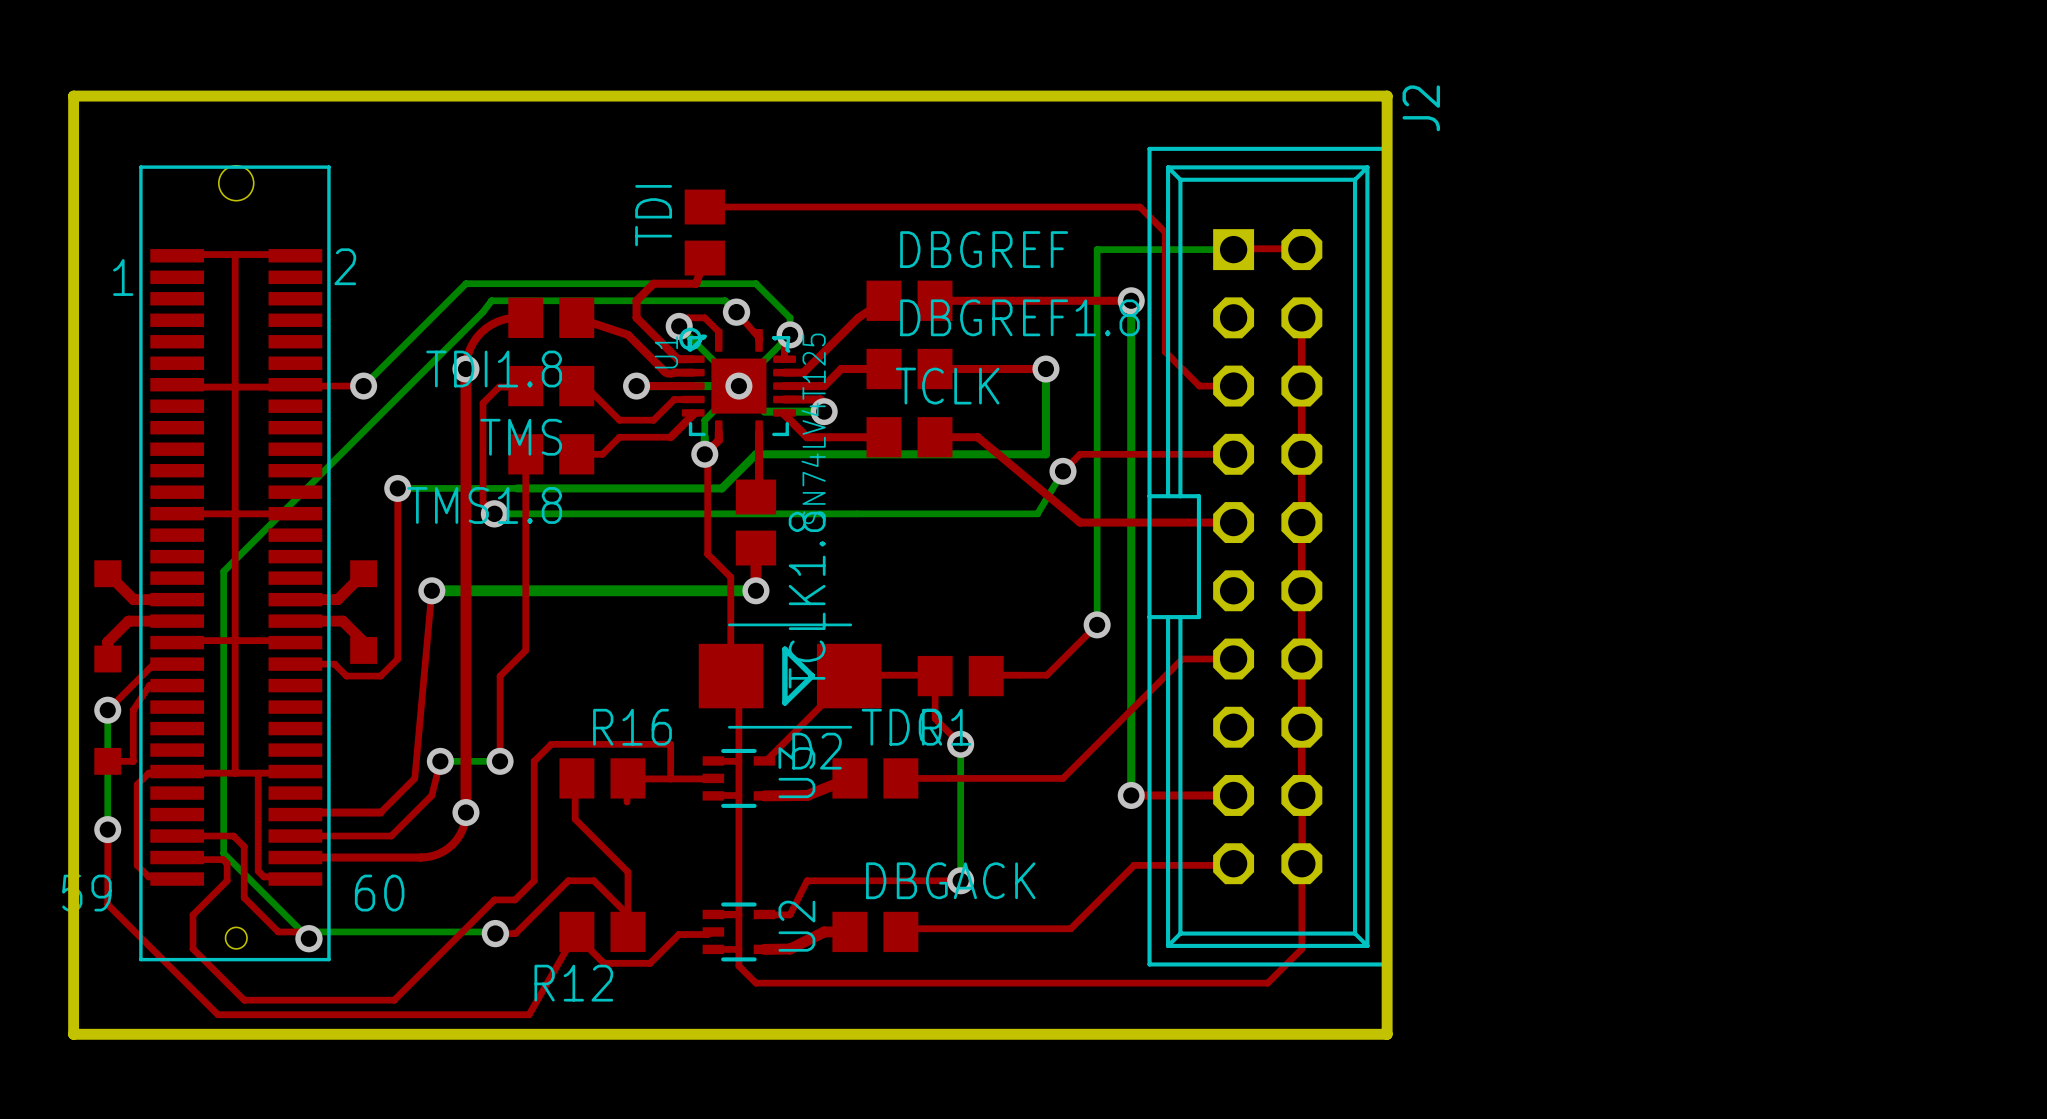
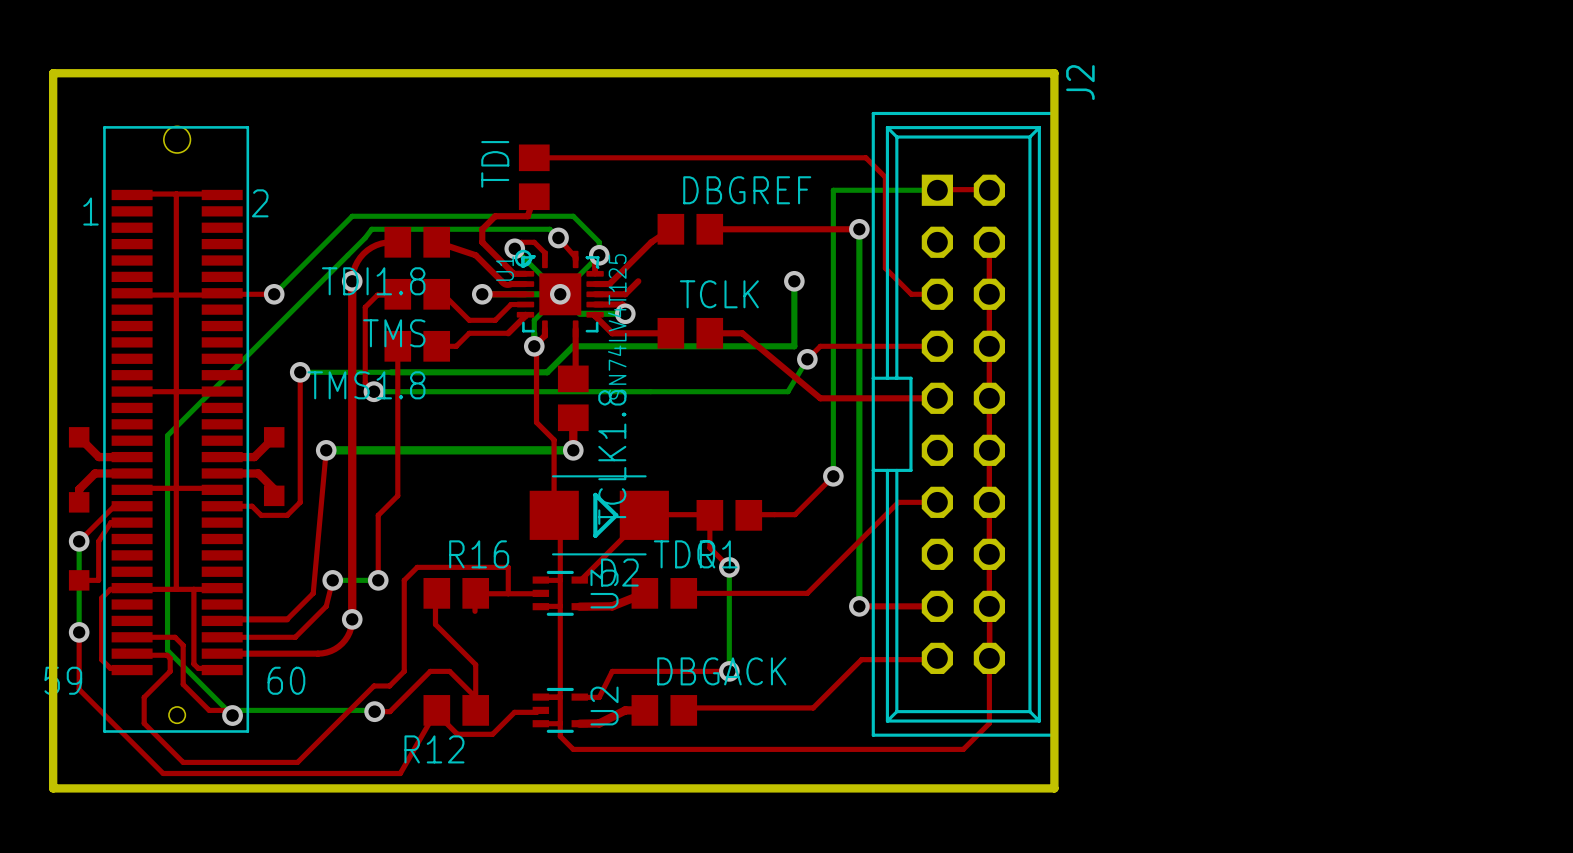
top track: (841, 369) (883, 369) -> none
DBGREF1.8: (909, 369) -> none
top track: (935, 369) (1045, 369) -> none

